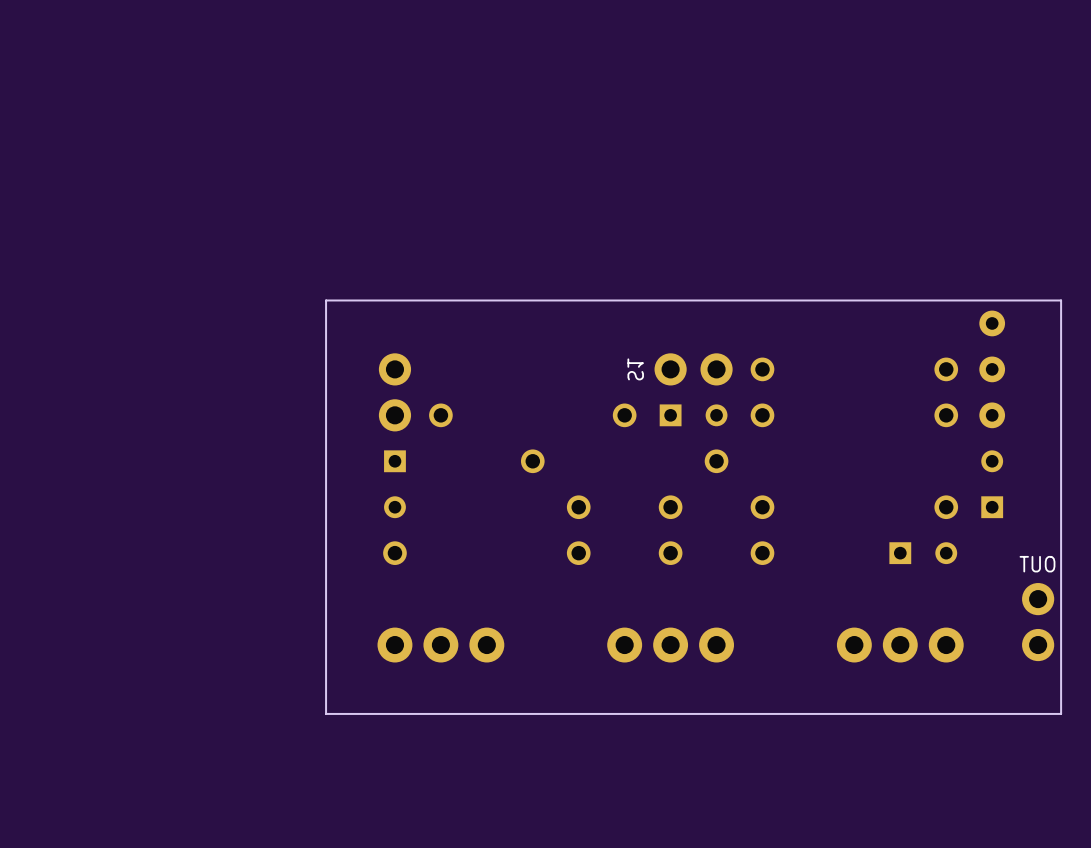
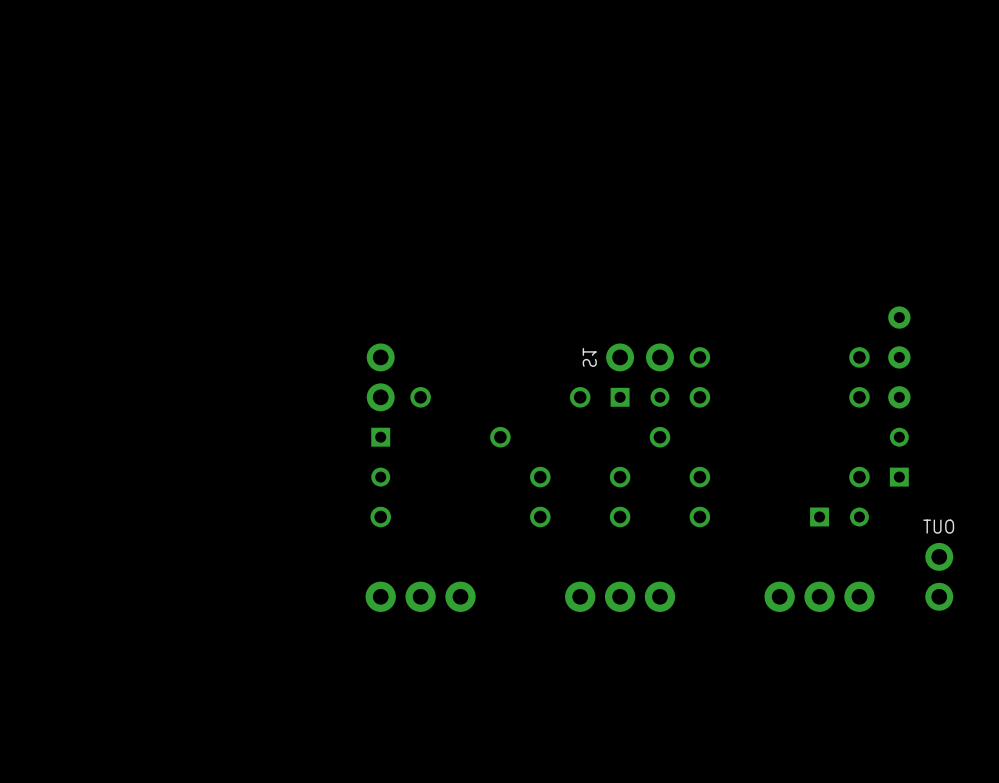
board edge: (1061, 300) (326, 300) (326, 713) (1061, 713) (1061, 300) -> none

